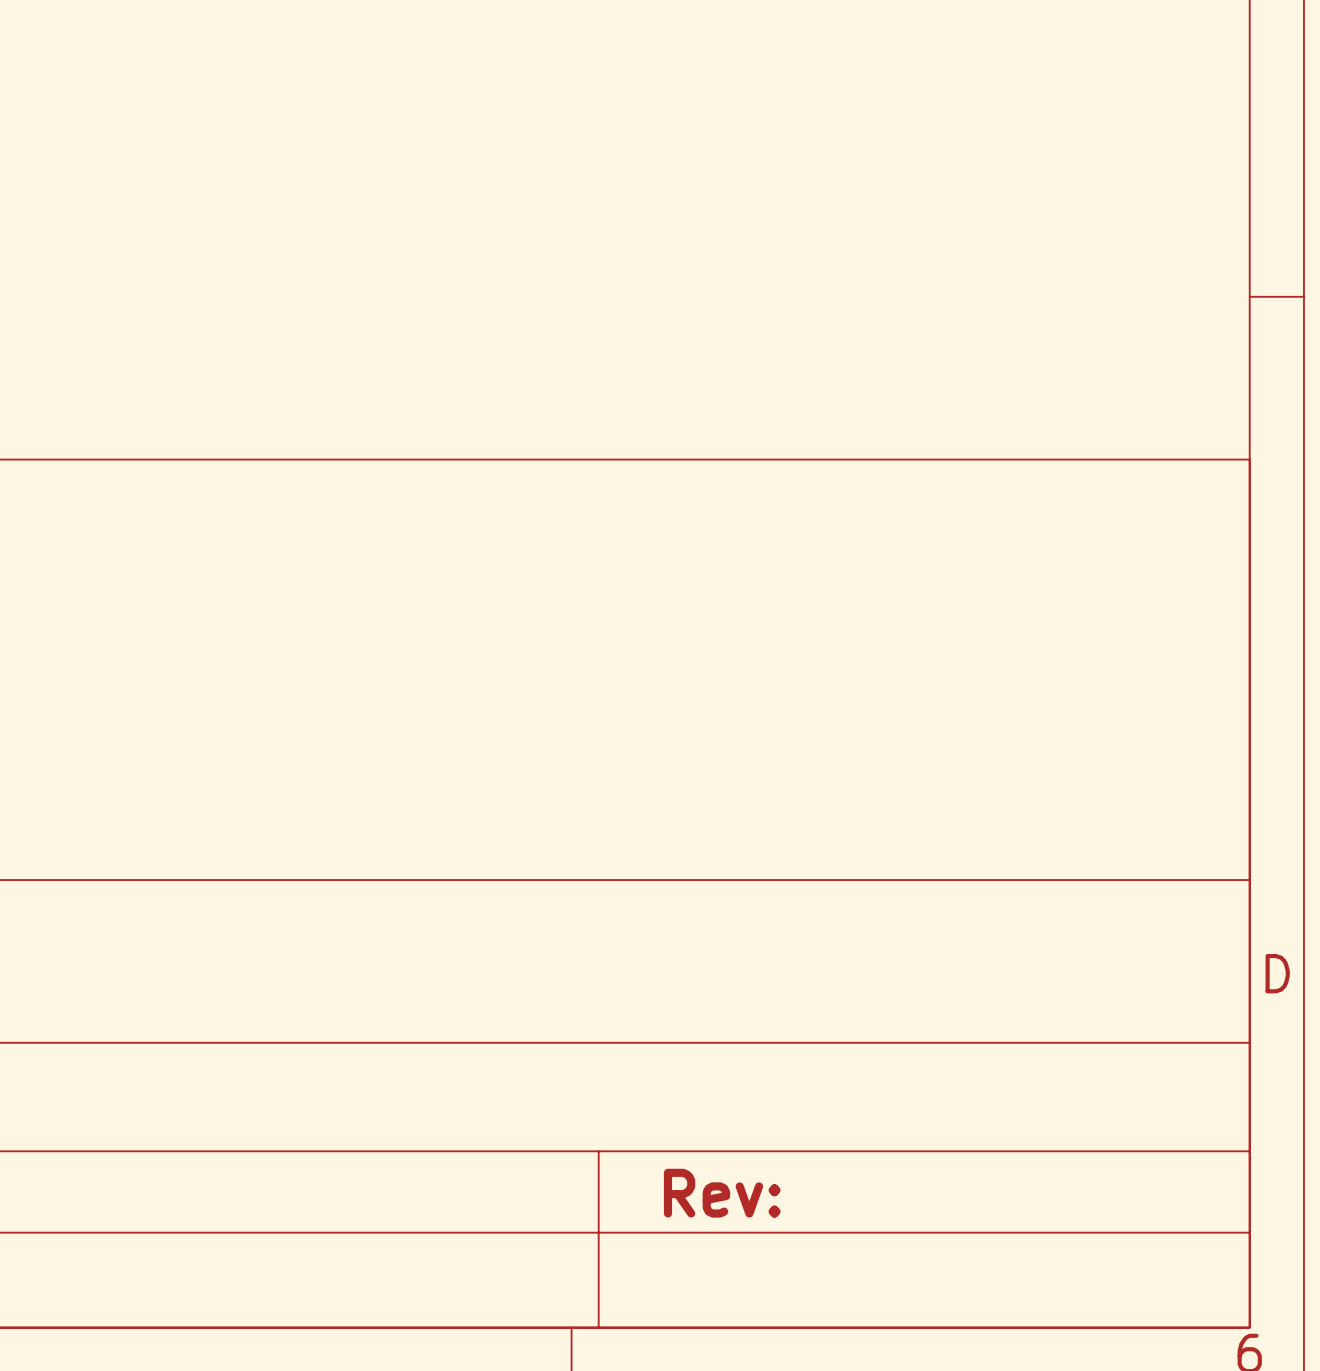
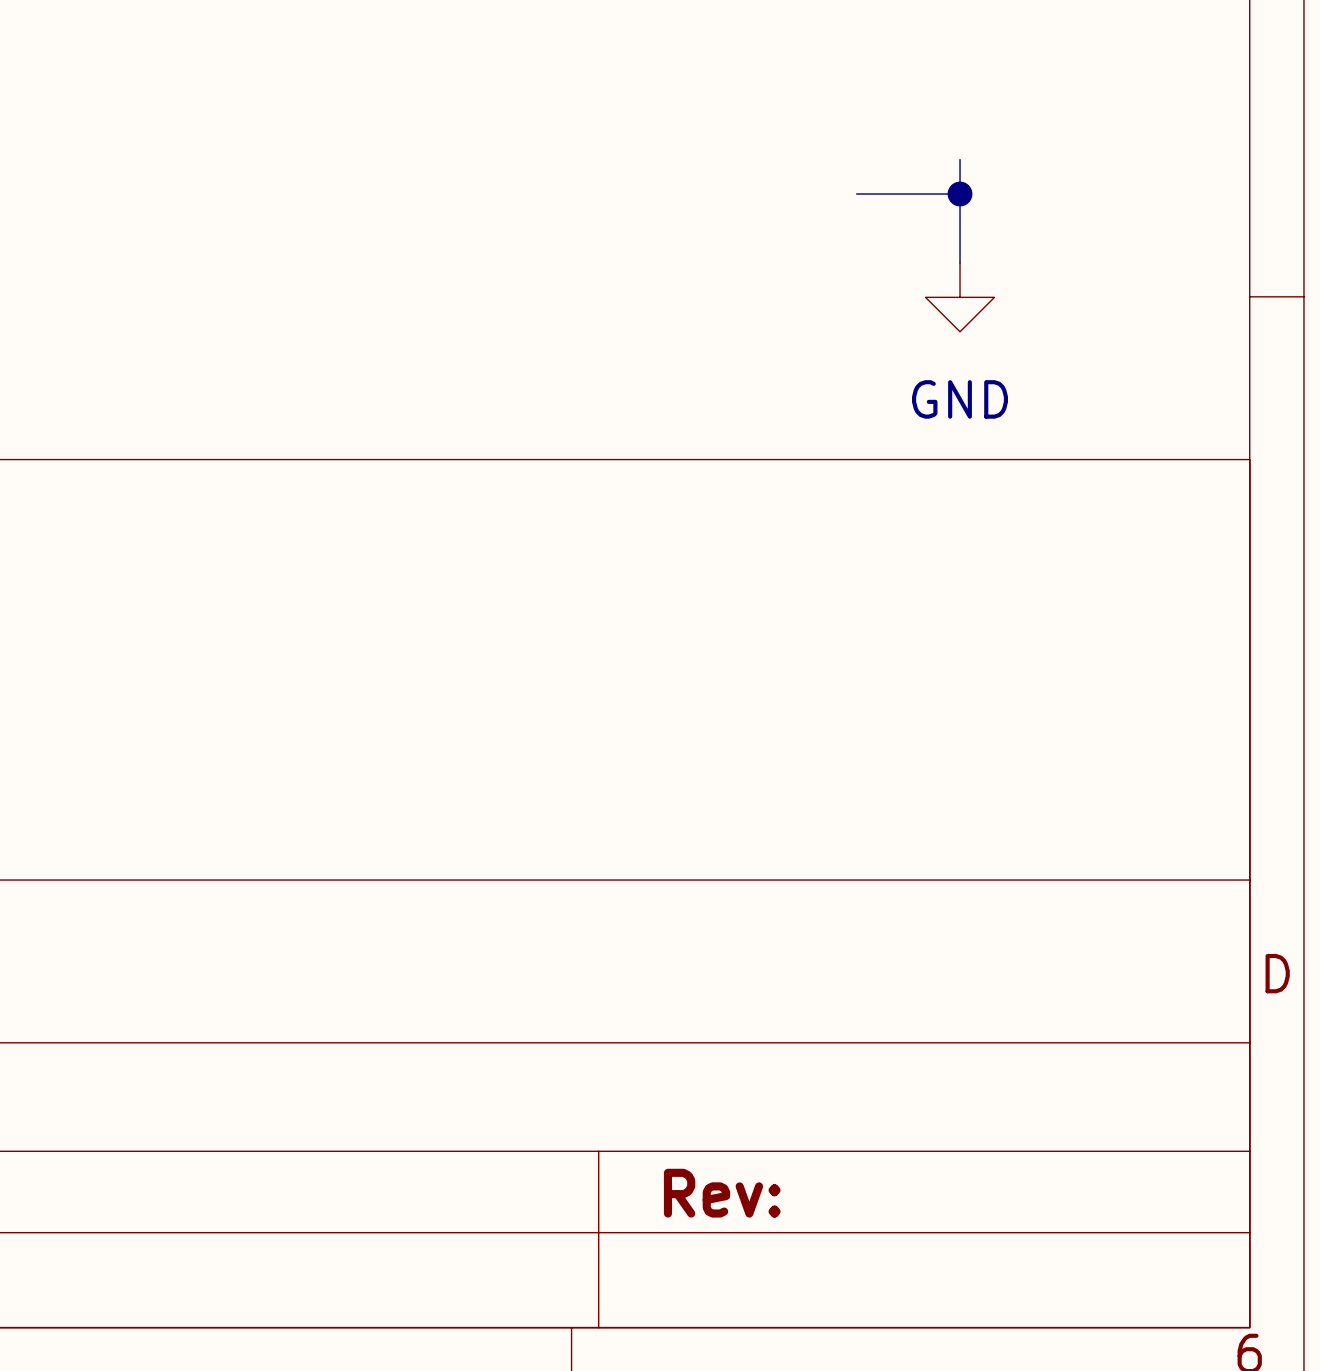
wire: none -> (960, 159) (960, 262)
wire: none -> (856, 194) (960, 194)
junction: none -> (960, 194)
power symbol: none -> GND (960, 297)

